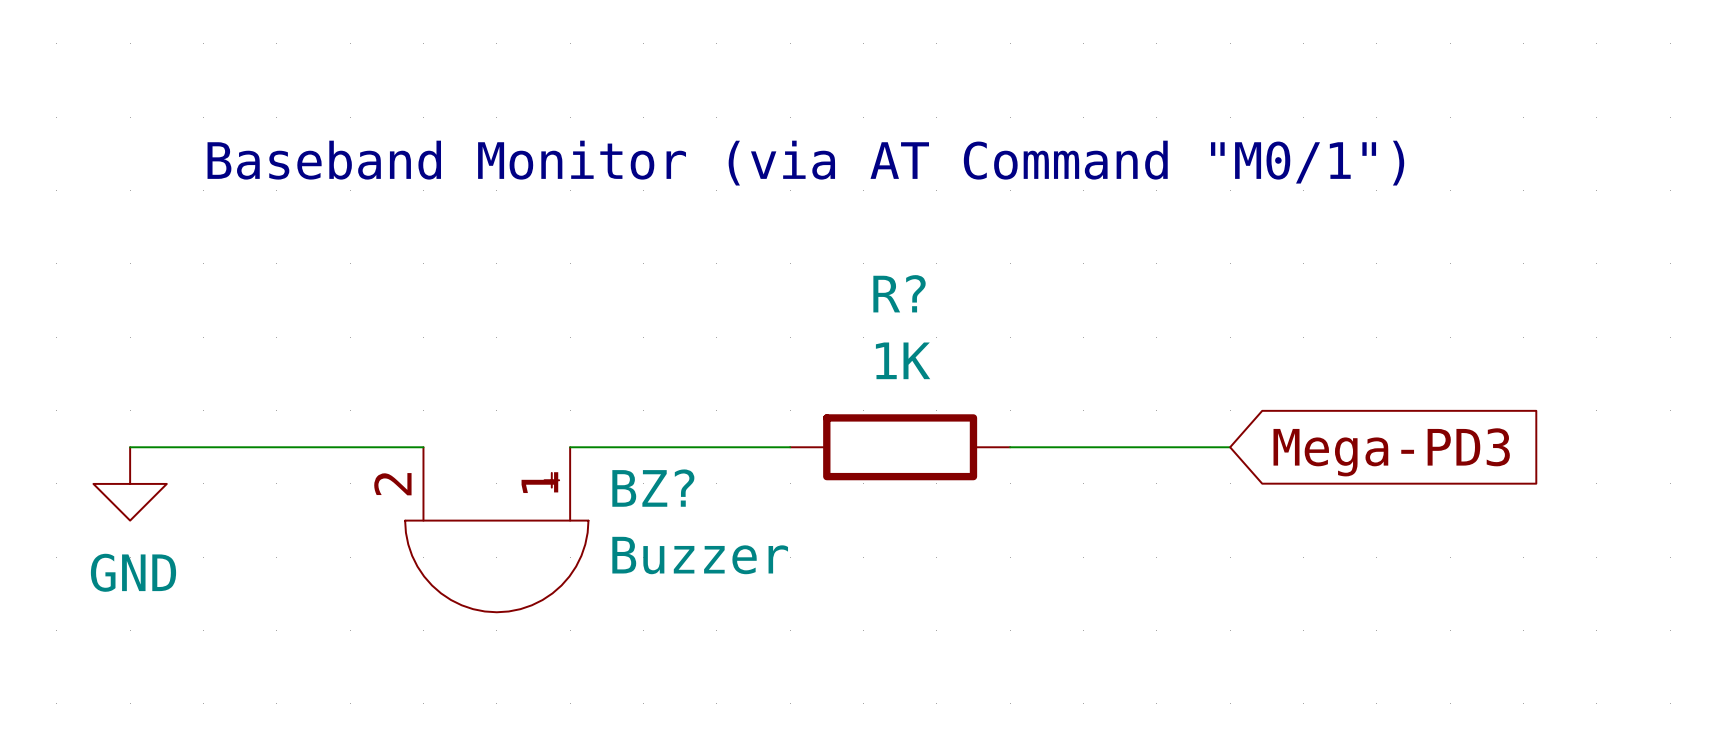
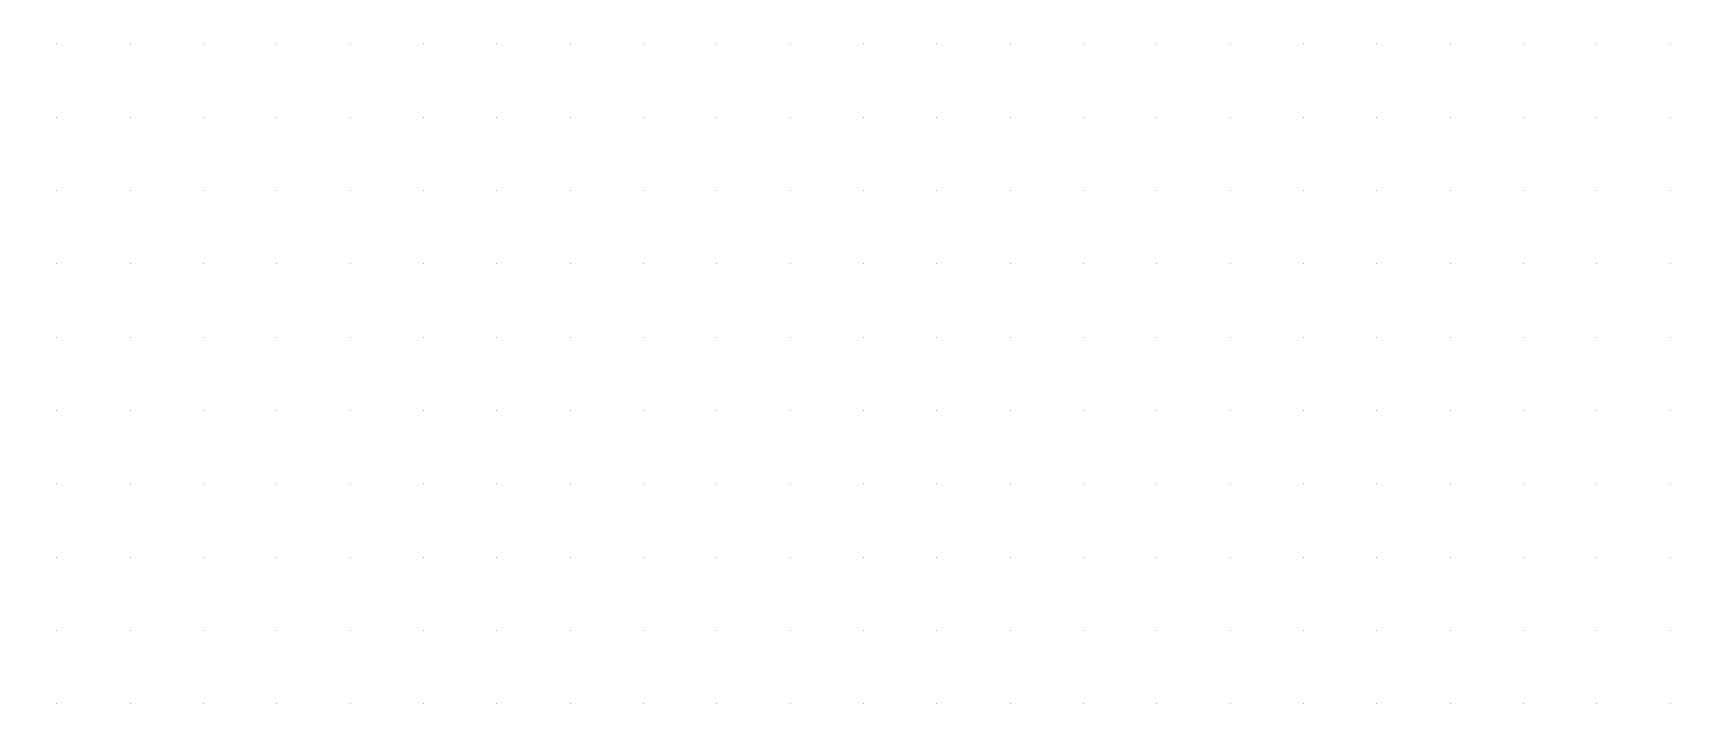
text: Baseband Monitor (via AT Command "M0/1") (805, 163) -> none
wire: (130, 447) (423, 447) -> none
wire: (570, 447) (790, 447) -> none
R?: 1K (900, 447) -> none
wire: (1010, 447) (1230, 447) -> none
global label: Mega-PD3 (1391, 452) -> none
power symbol: GND (130, 483) -> none
BZ?: Buzzer (496, 529) -> none

